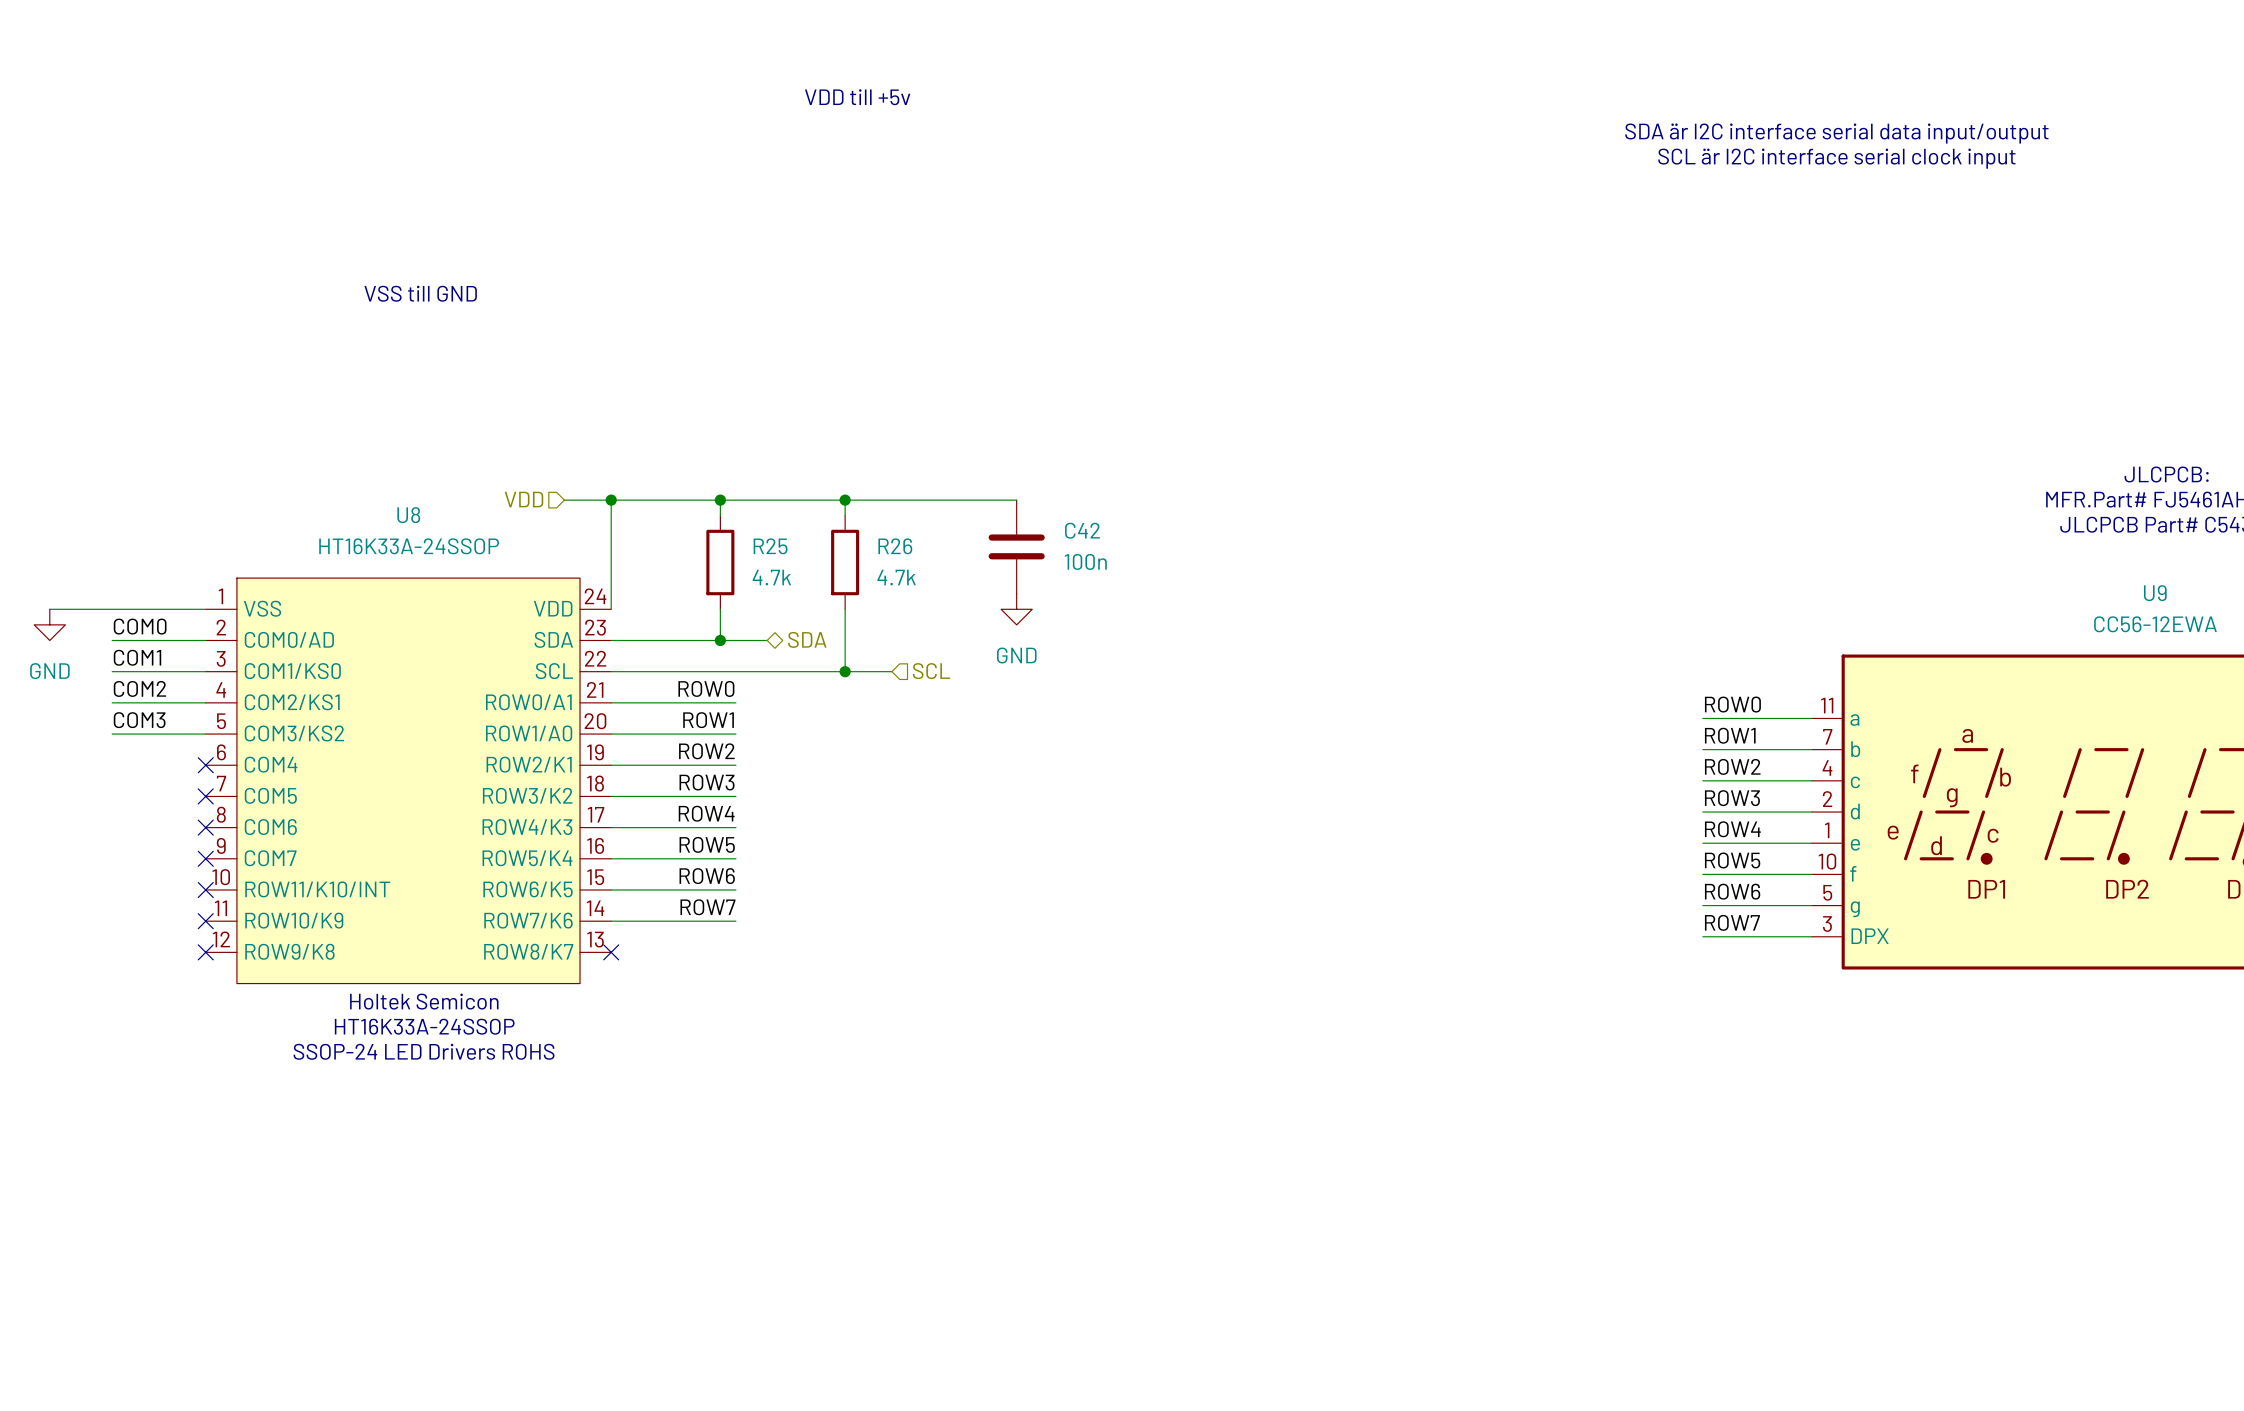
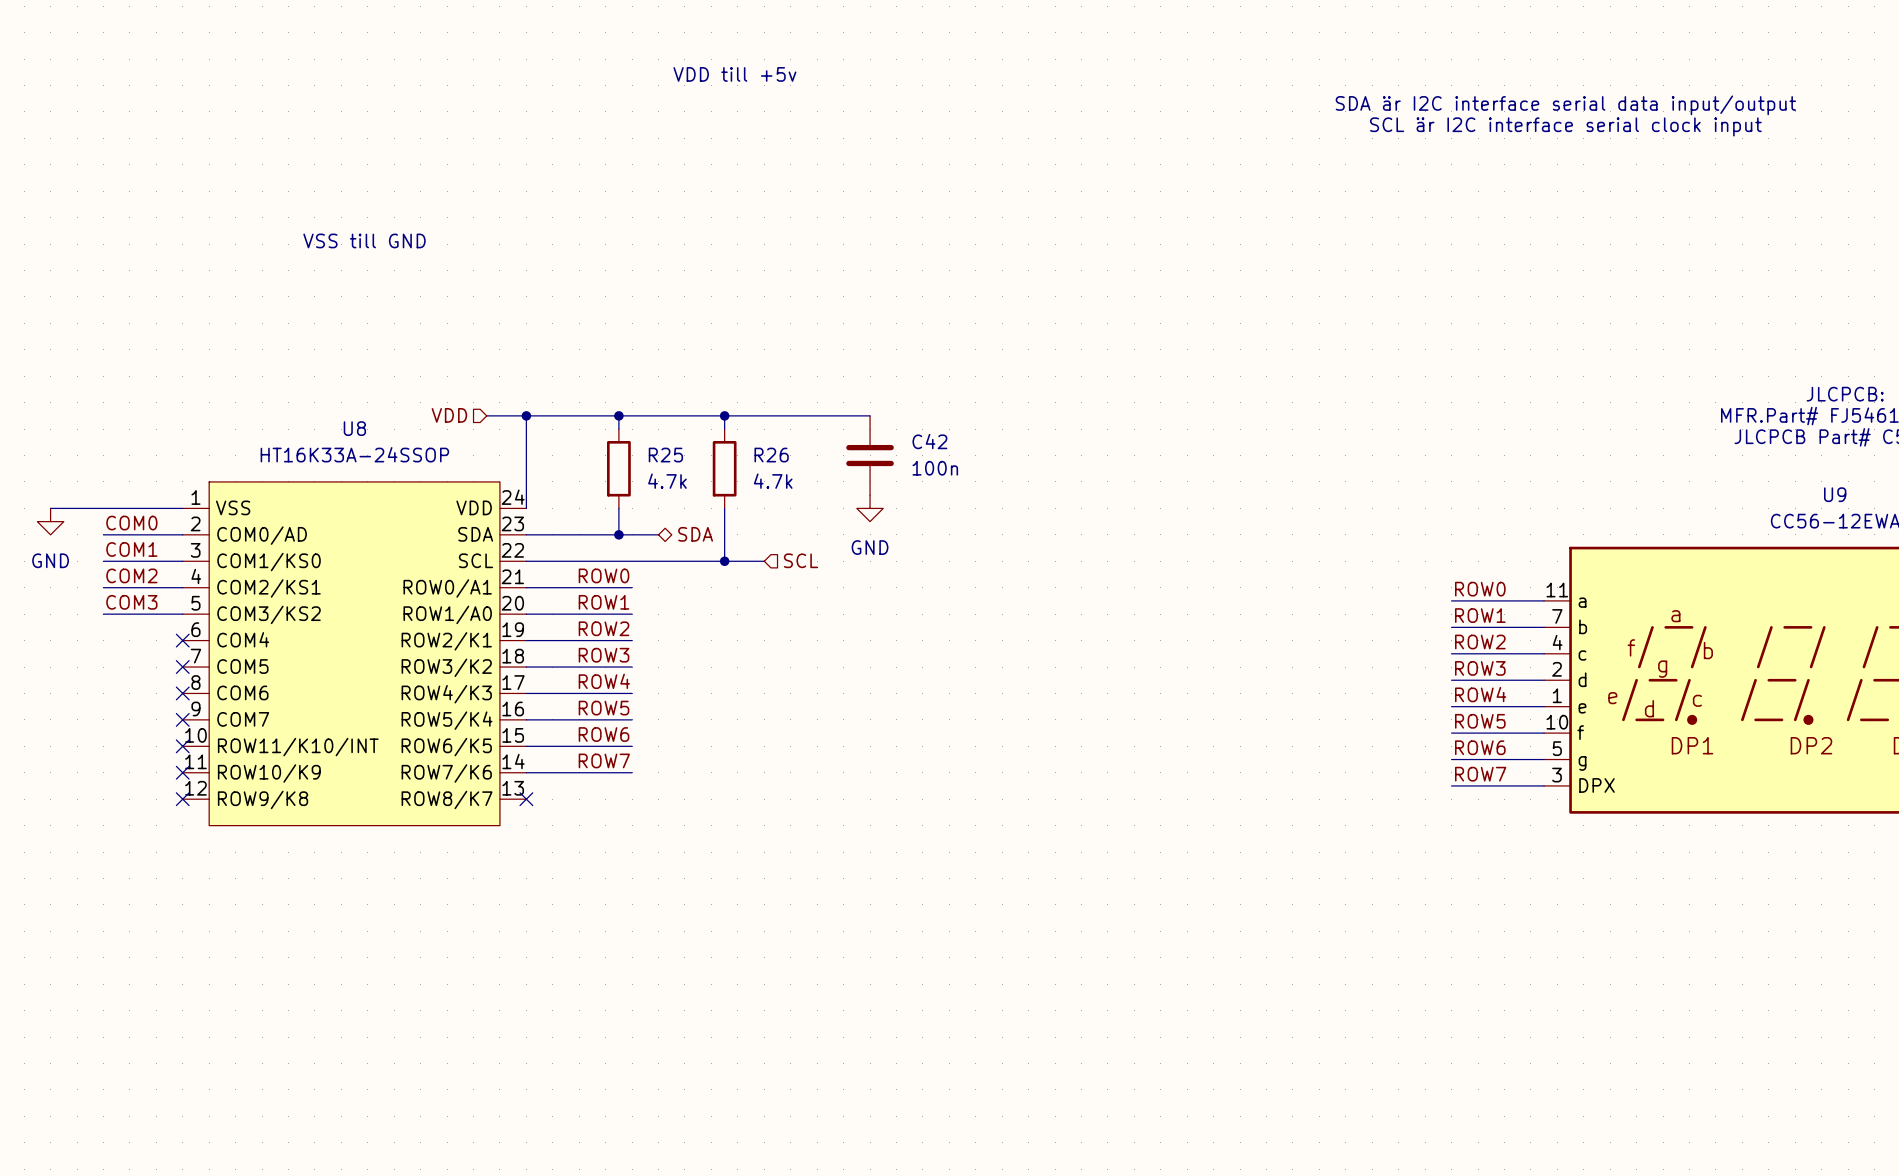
text: Holtek Semicon (424, 1001) -> none
text: HT16K33A-24SSOP (424, 1026) -> none
text: SSOP-24 LED Drivers ROHS (424, 1051) -> none

